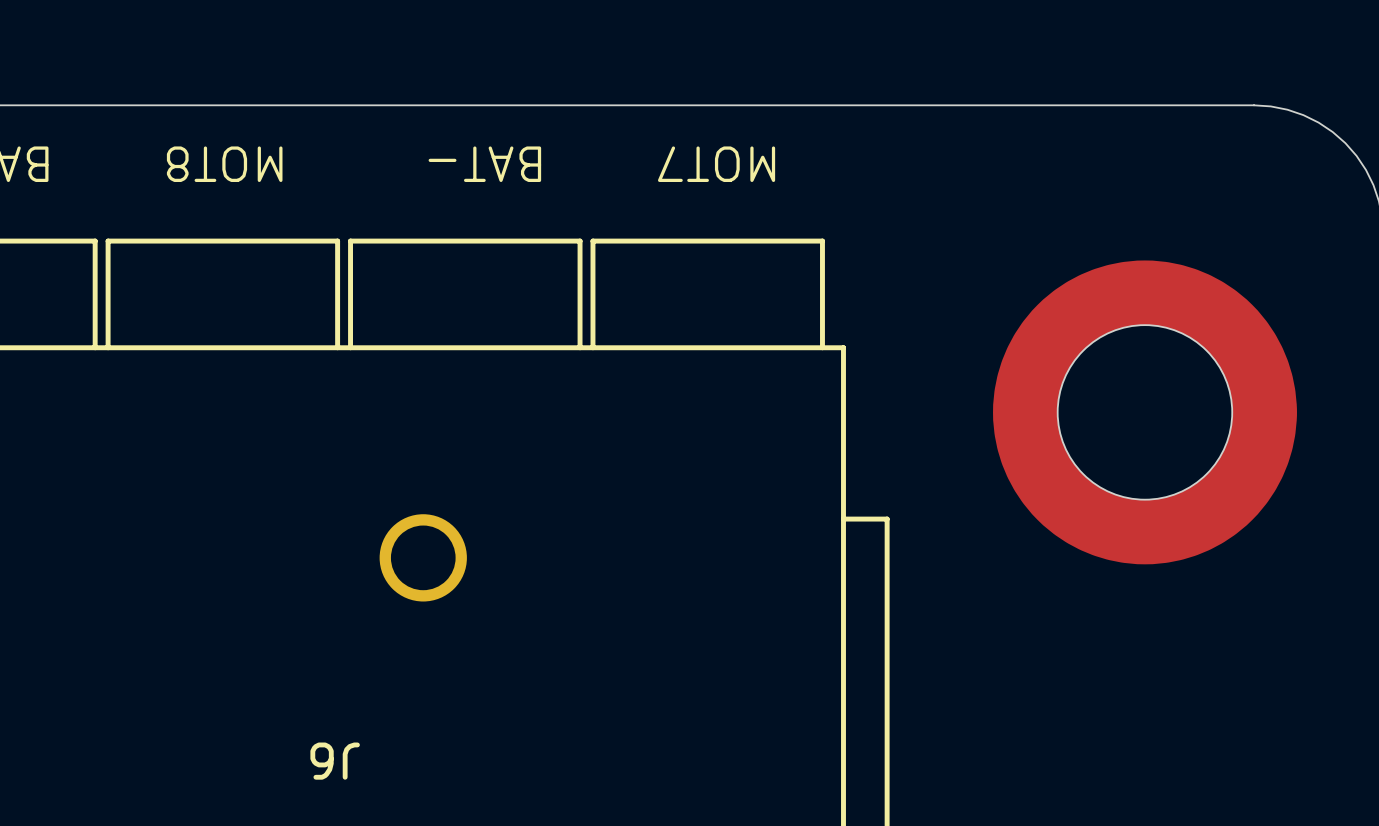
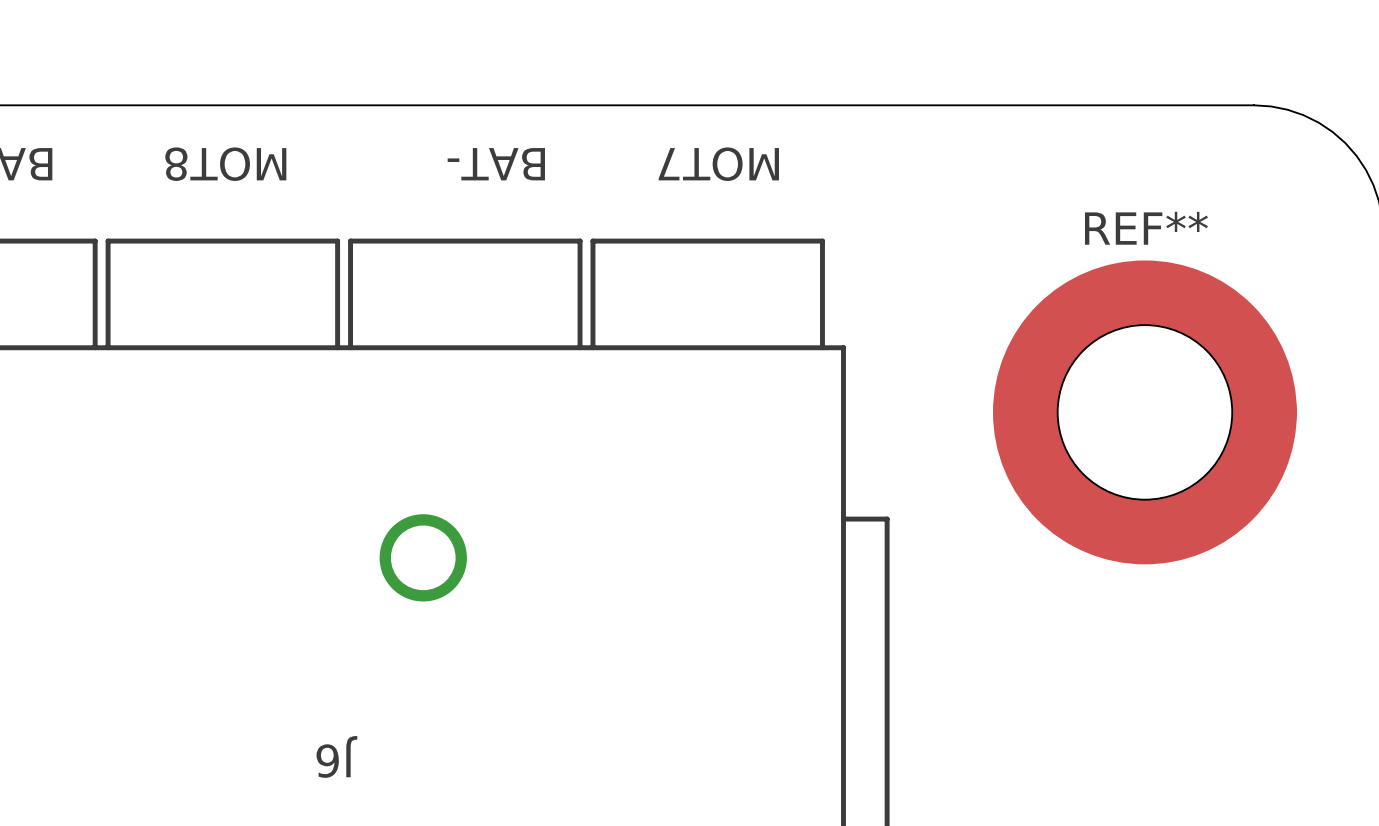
REF** name: none -> REF** (1146, 228)

